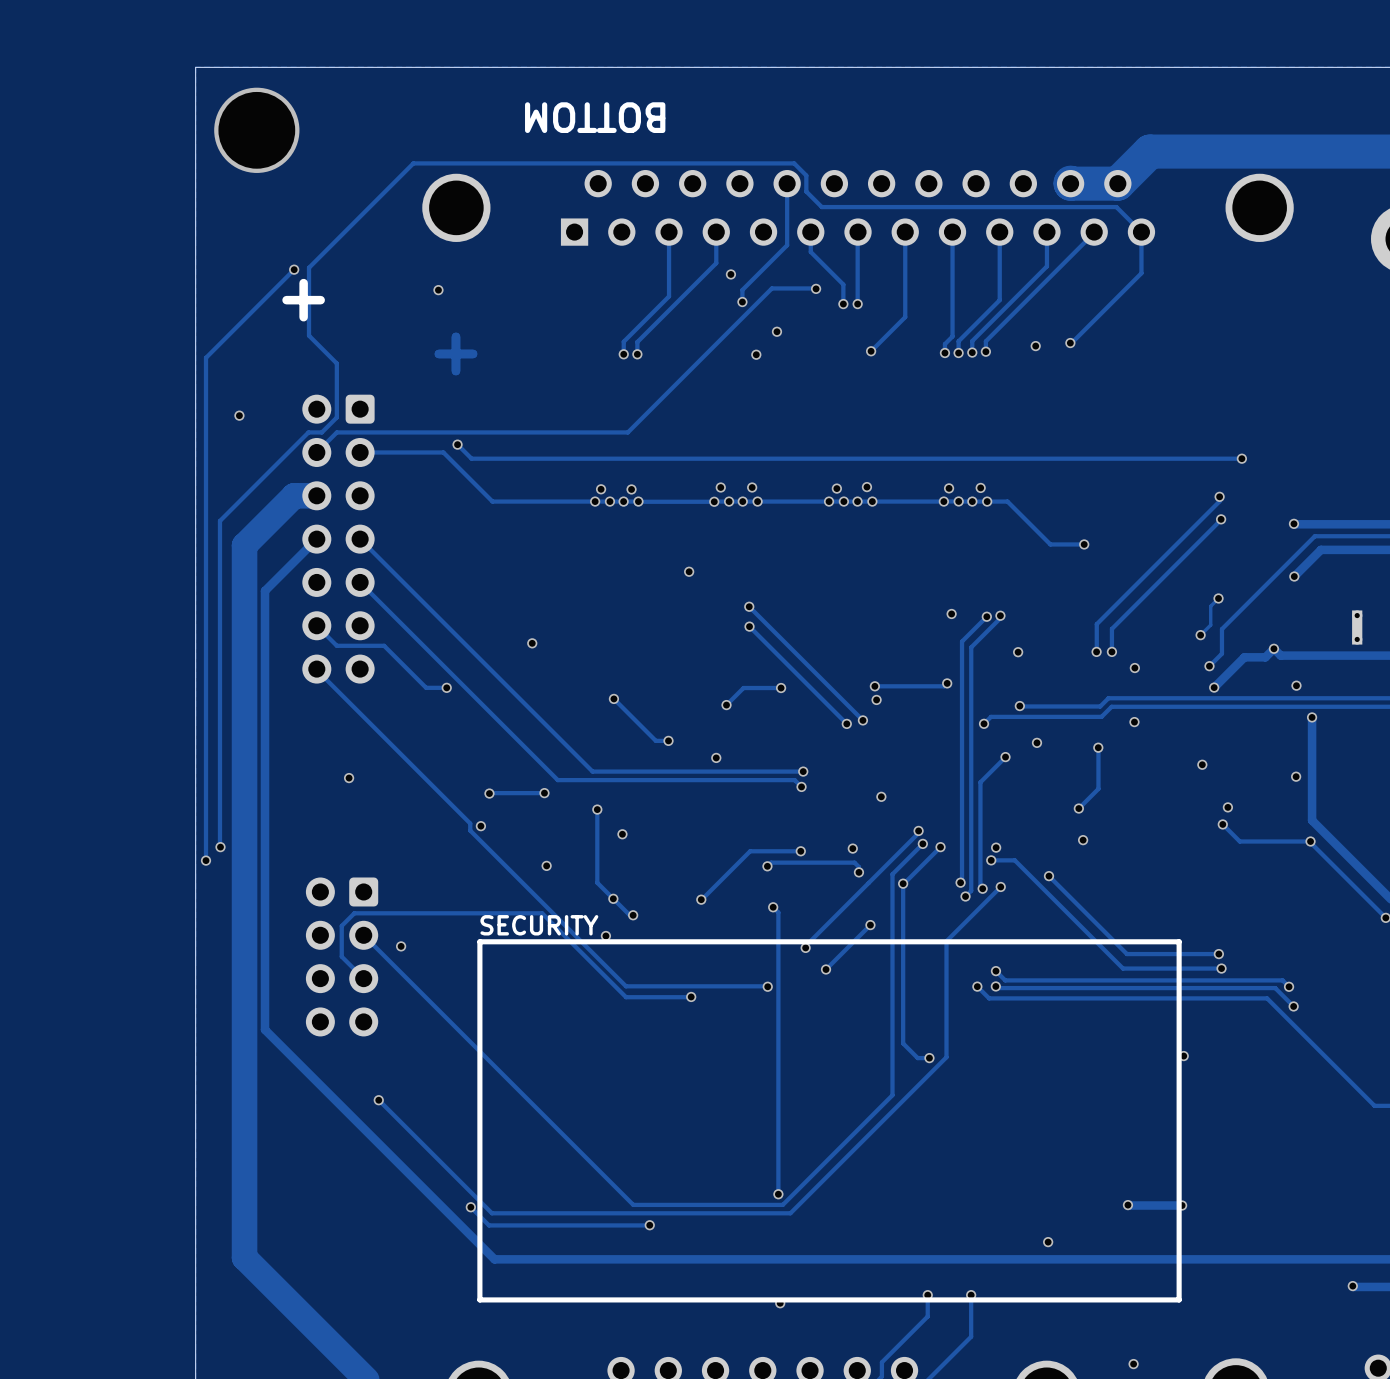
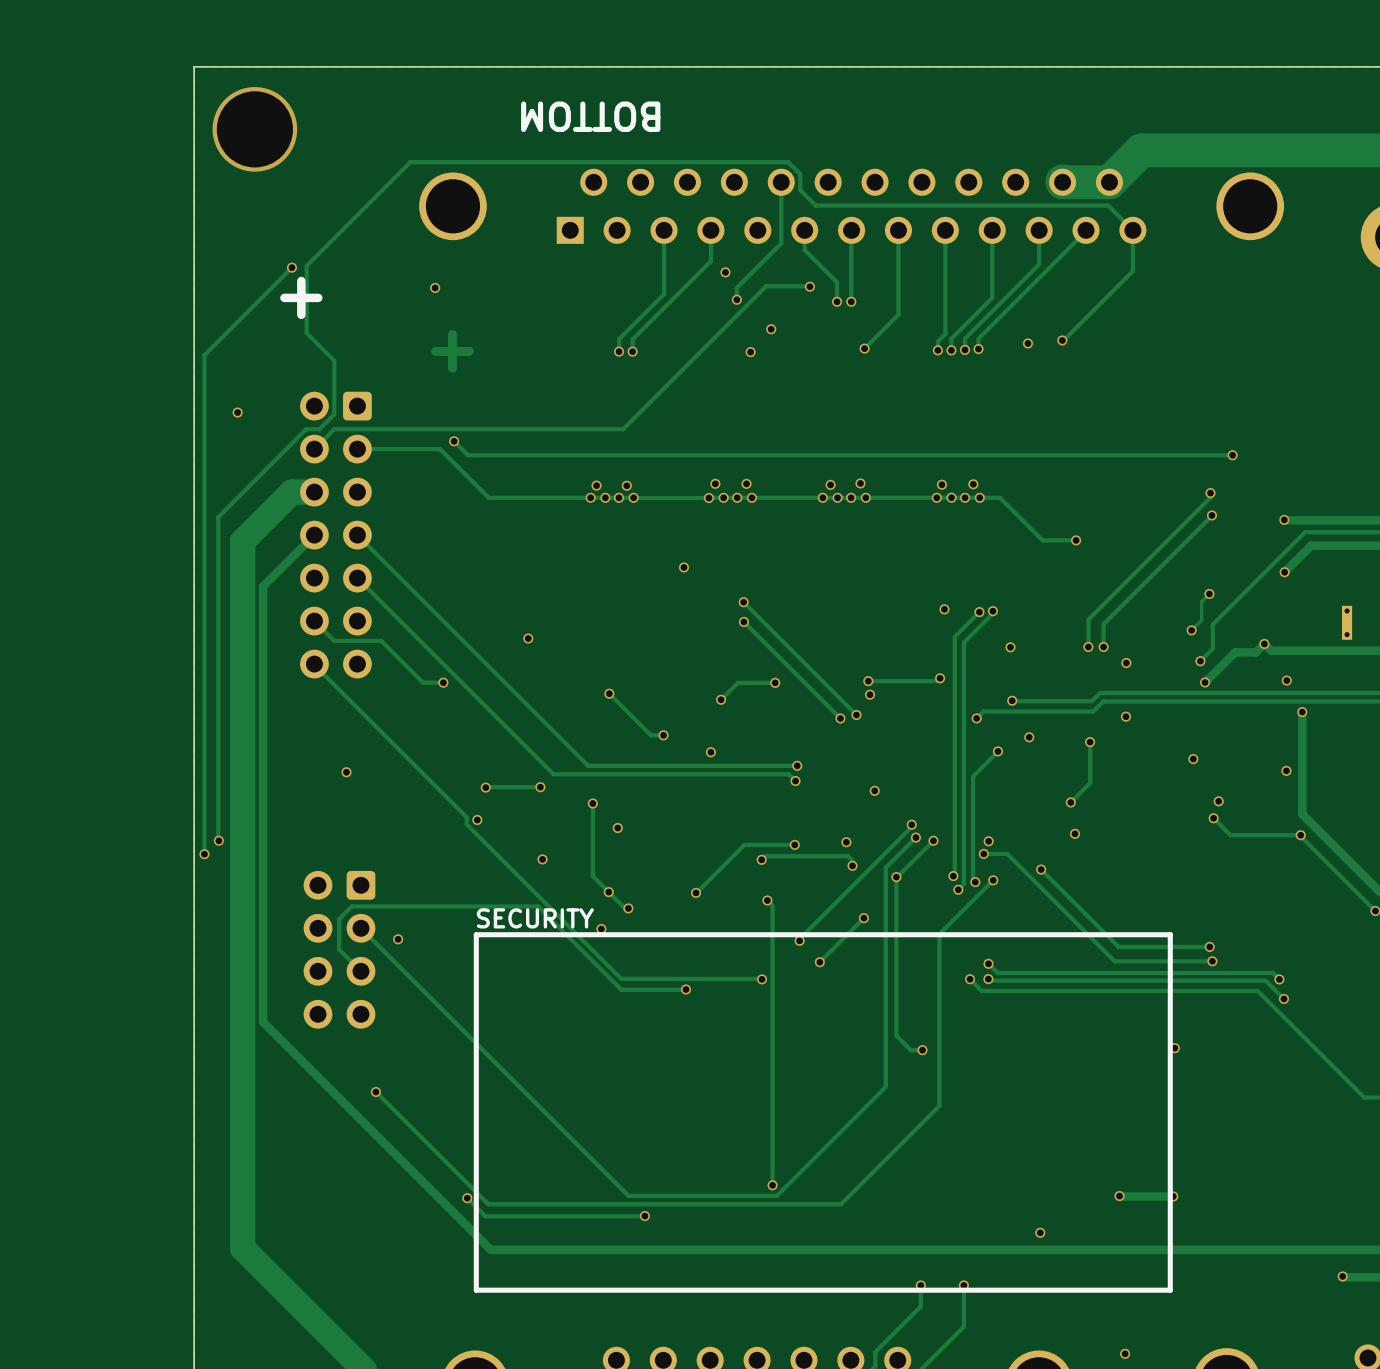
track: (946, 1057) (790, 1213) -> (939, 1049) (939, 1105) (841, 1204) (784, 1204)
via: (780, 1303) -> none

